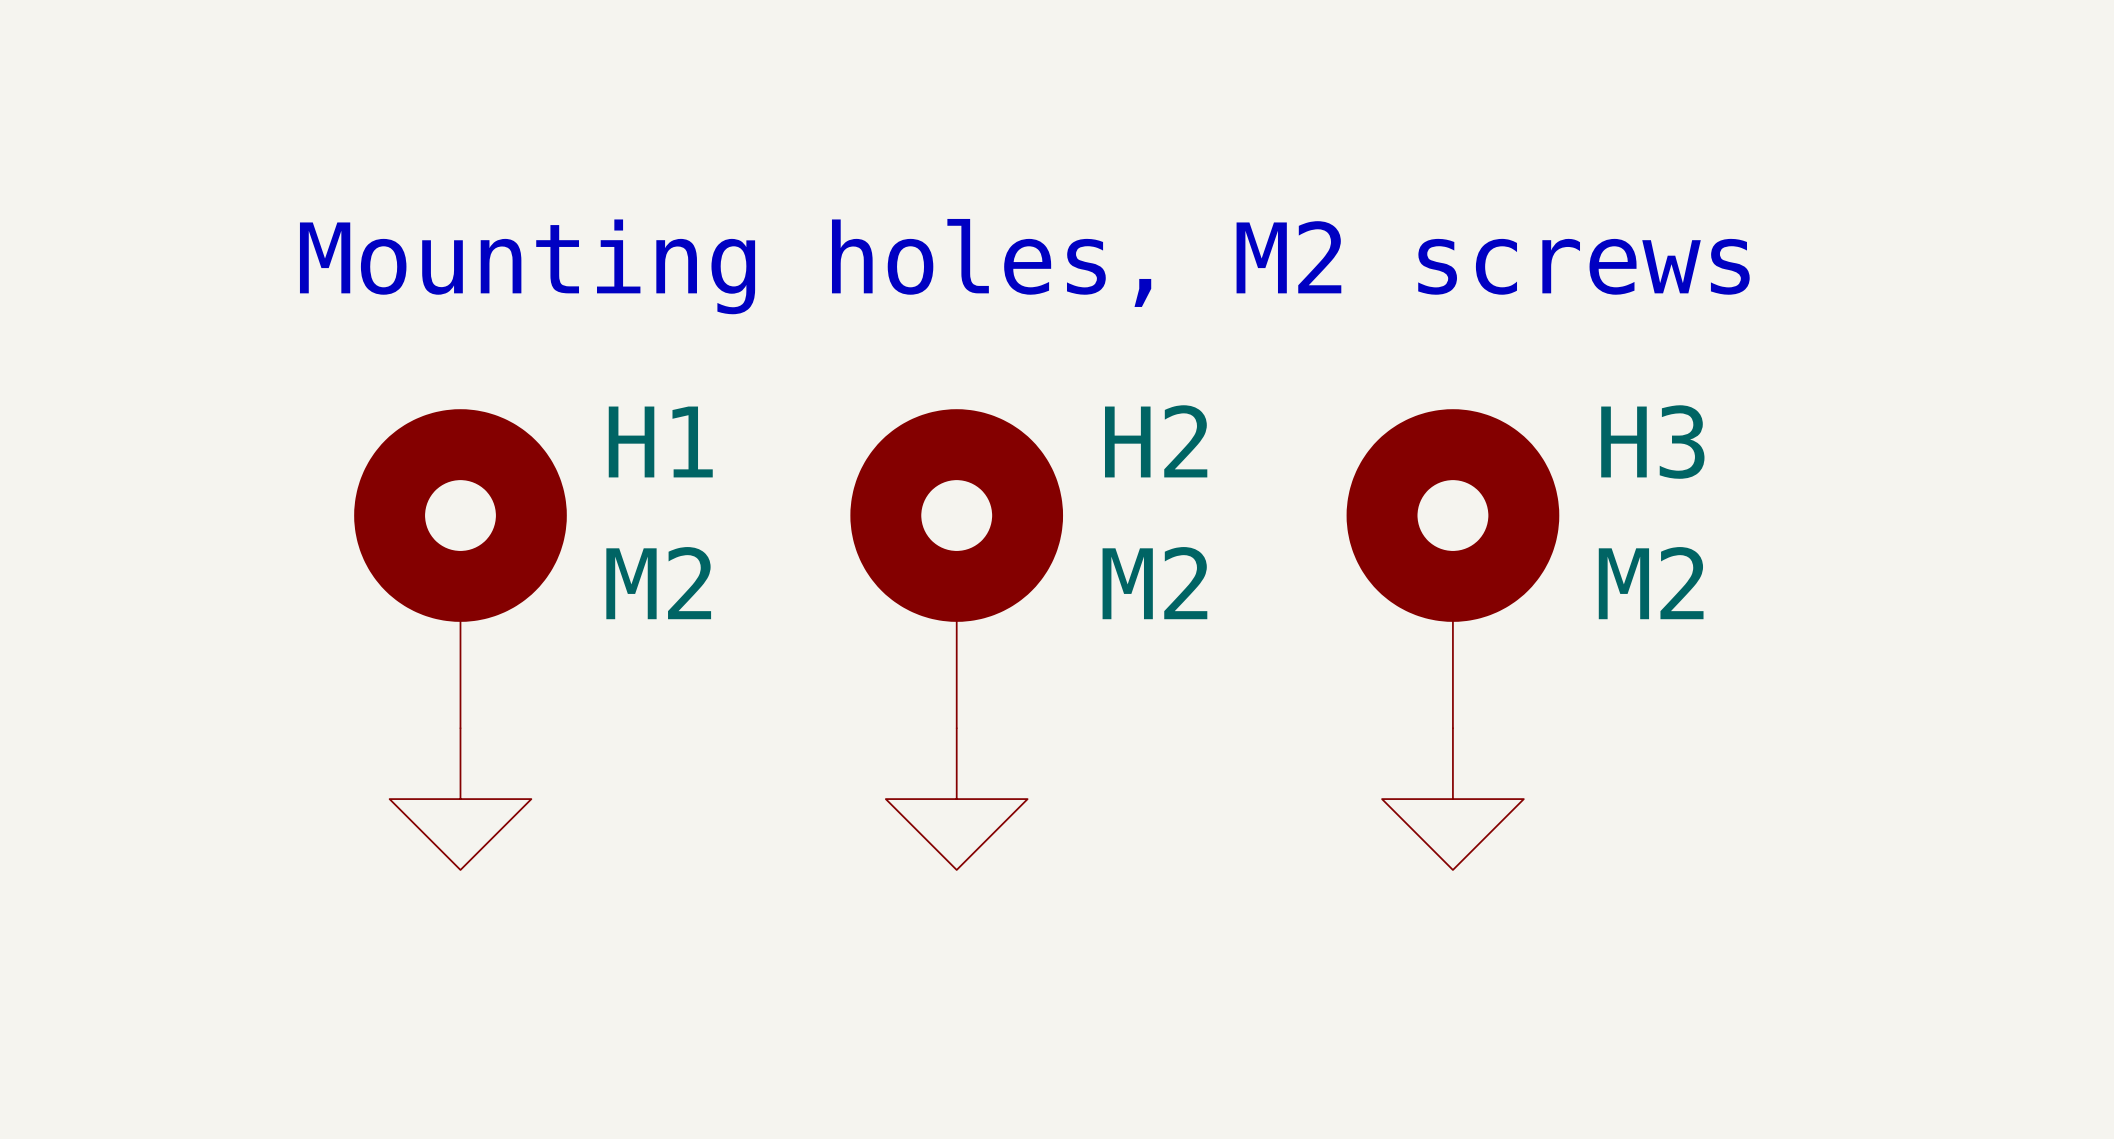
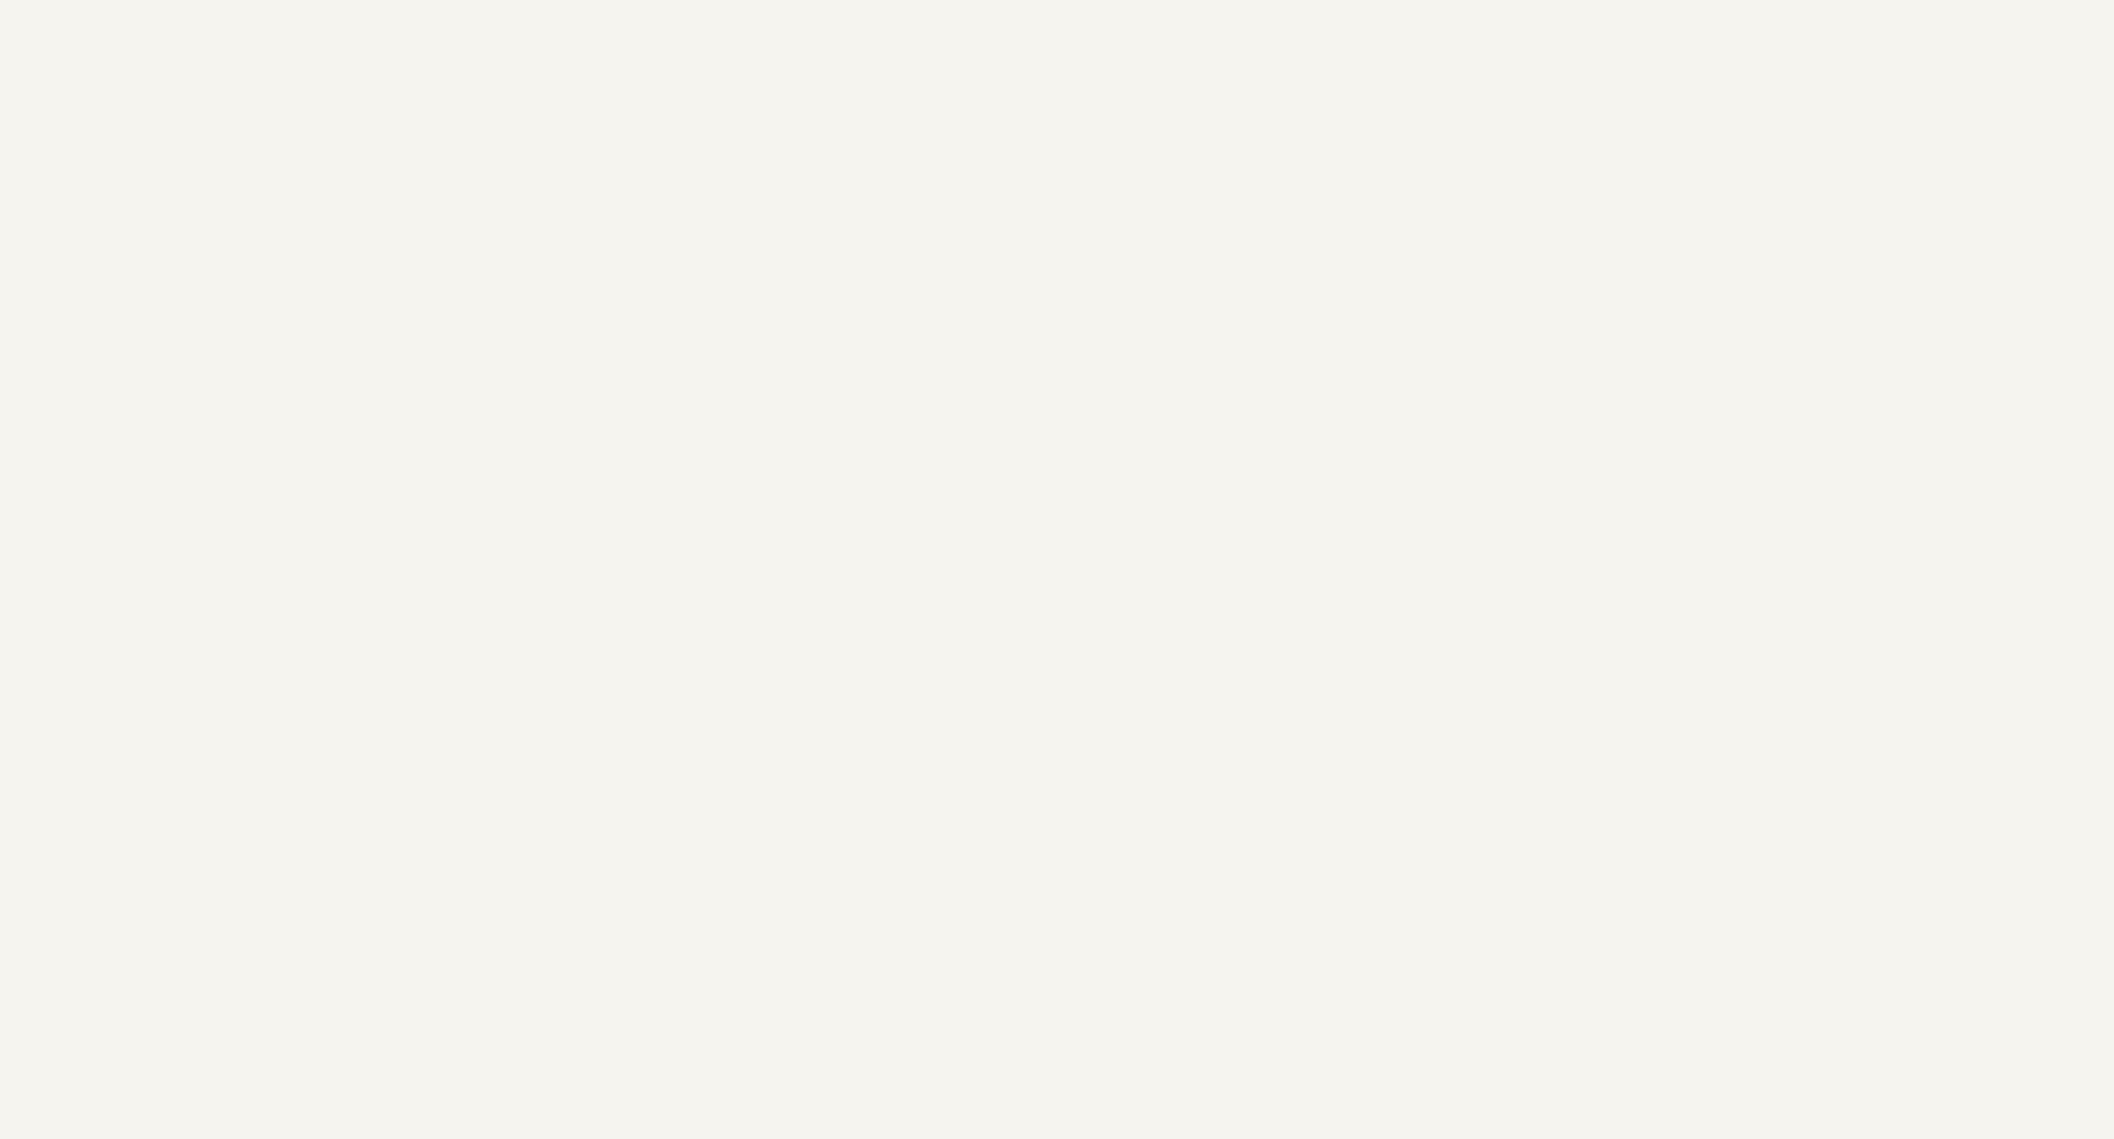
text: Mounting holes, M2 screws (1024, 266) -> none
H1: M2 (460, 568) -> none
H2: M2 (956, 568) -> none
H3: M2 (1452, 568) -> none
power symbol: (460, 799) -> none
power symbol: (956, 799) -> none
power symbol: (1452, 799) -> none

